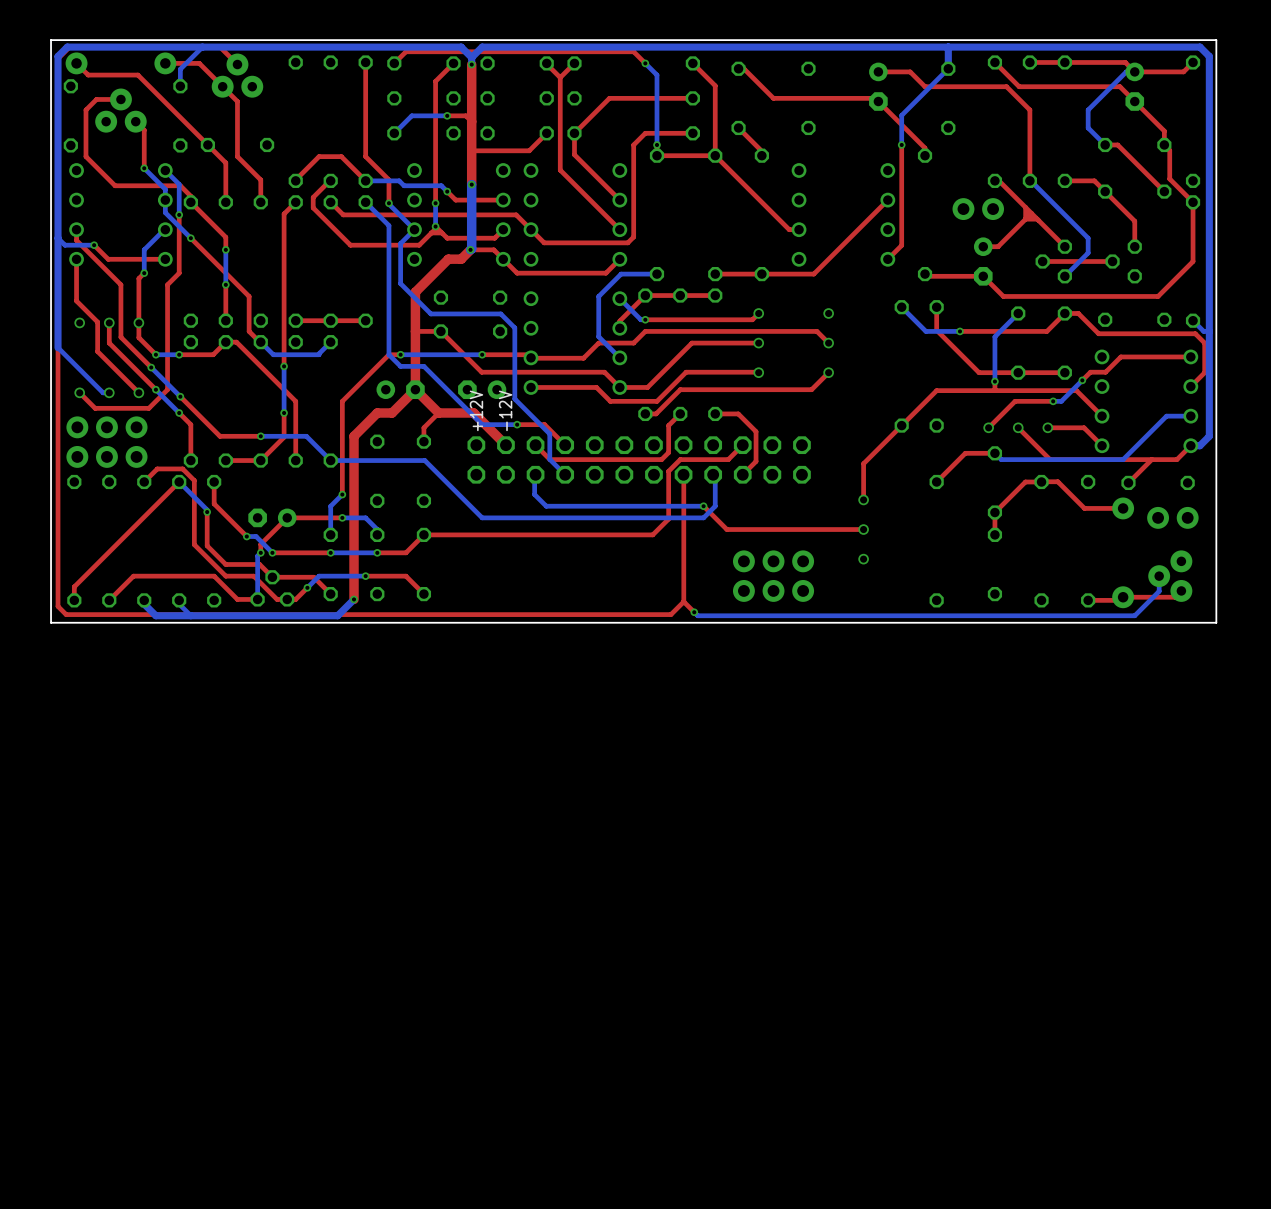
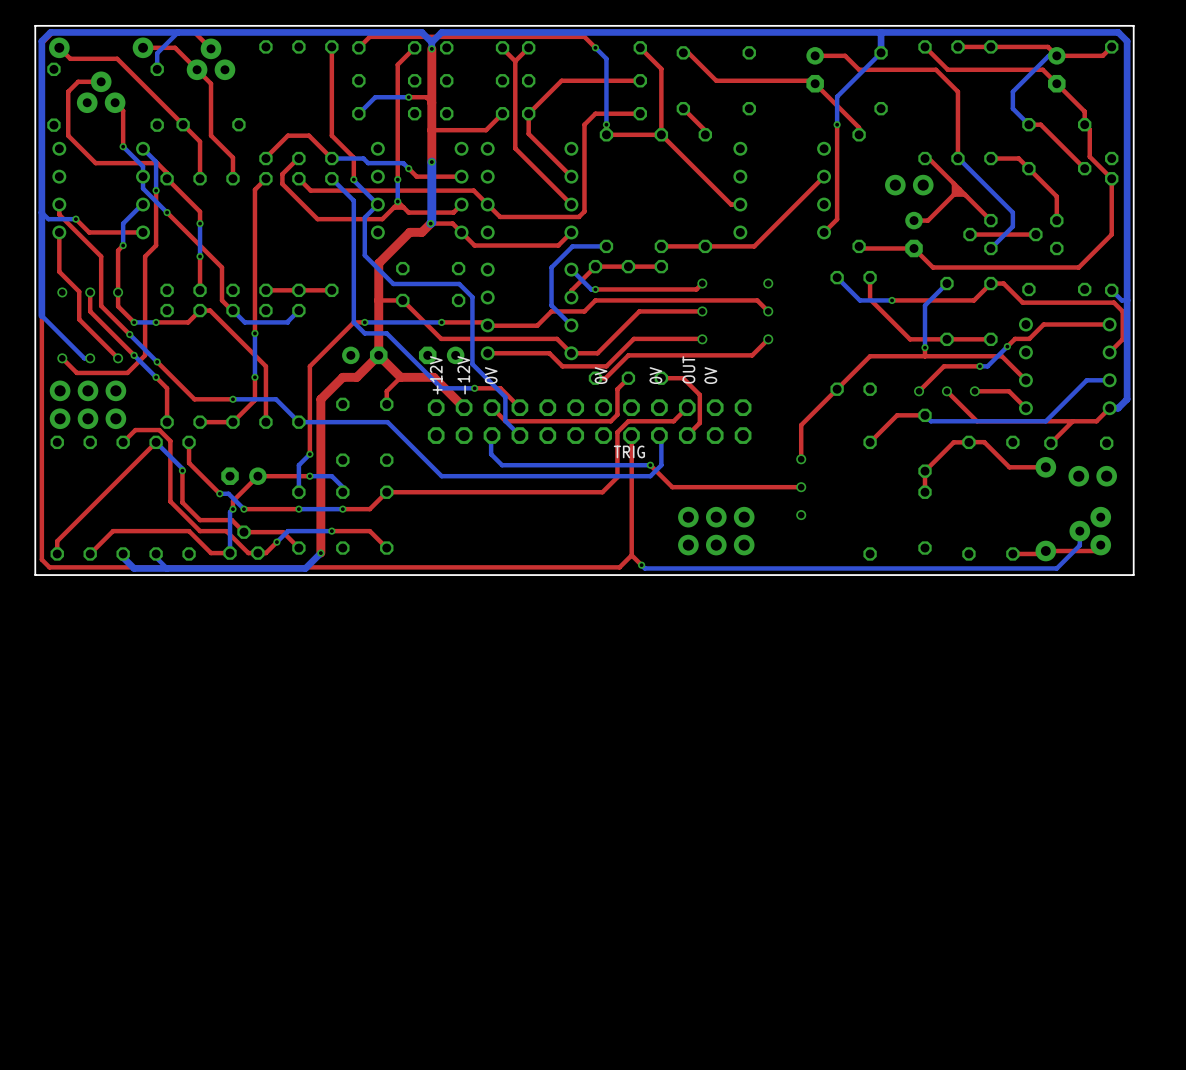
text: none -> OUT (688, 369)
text: none -> 0V (491, 375)
text: none -> 0V (601, 375)
text: none -> 0V (655, 375)
text: none -> 0V (710, 375)
text: none -> TRIG (629, 451)

